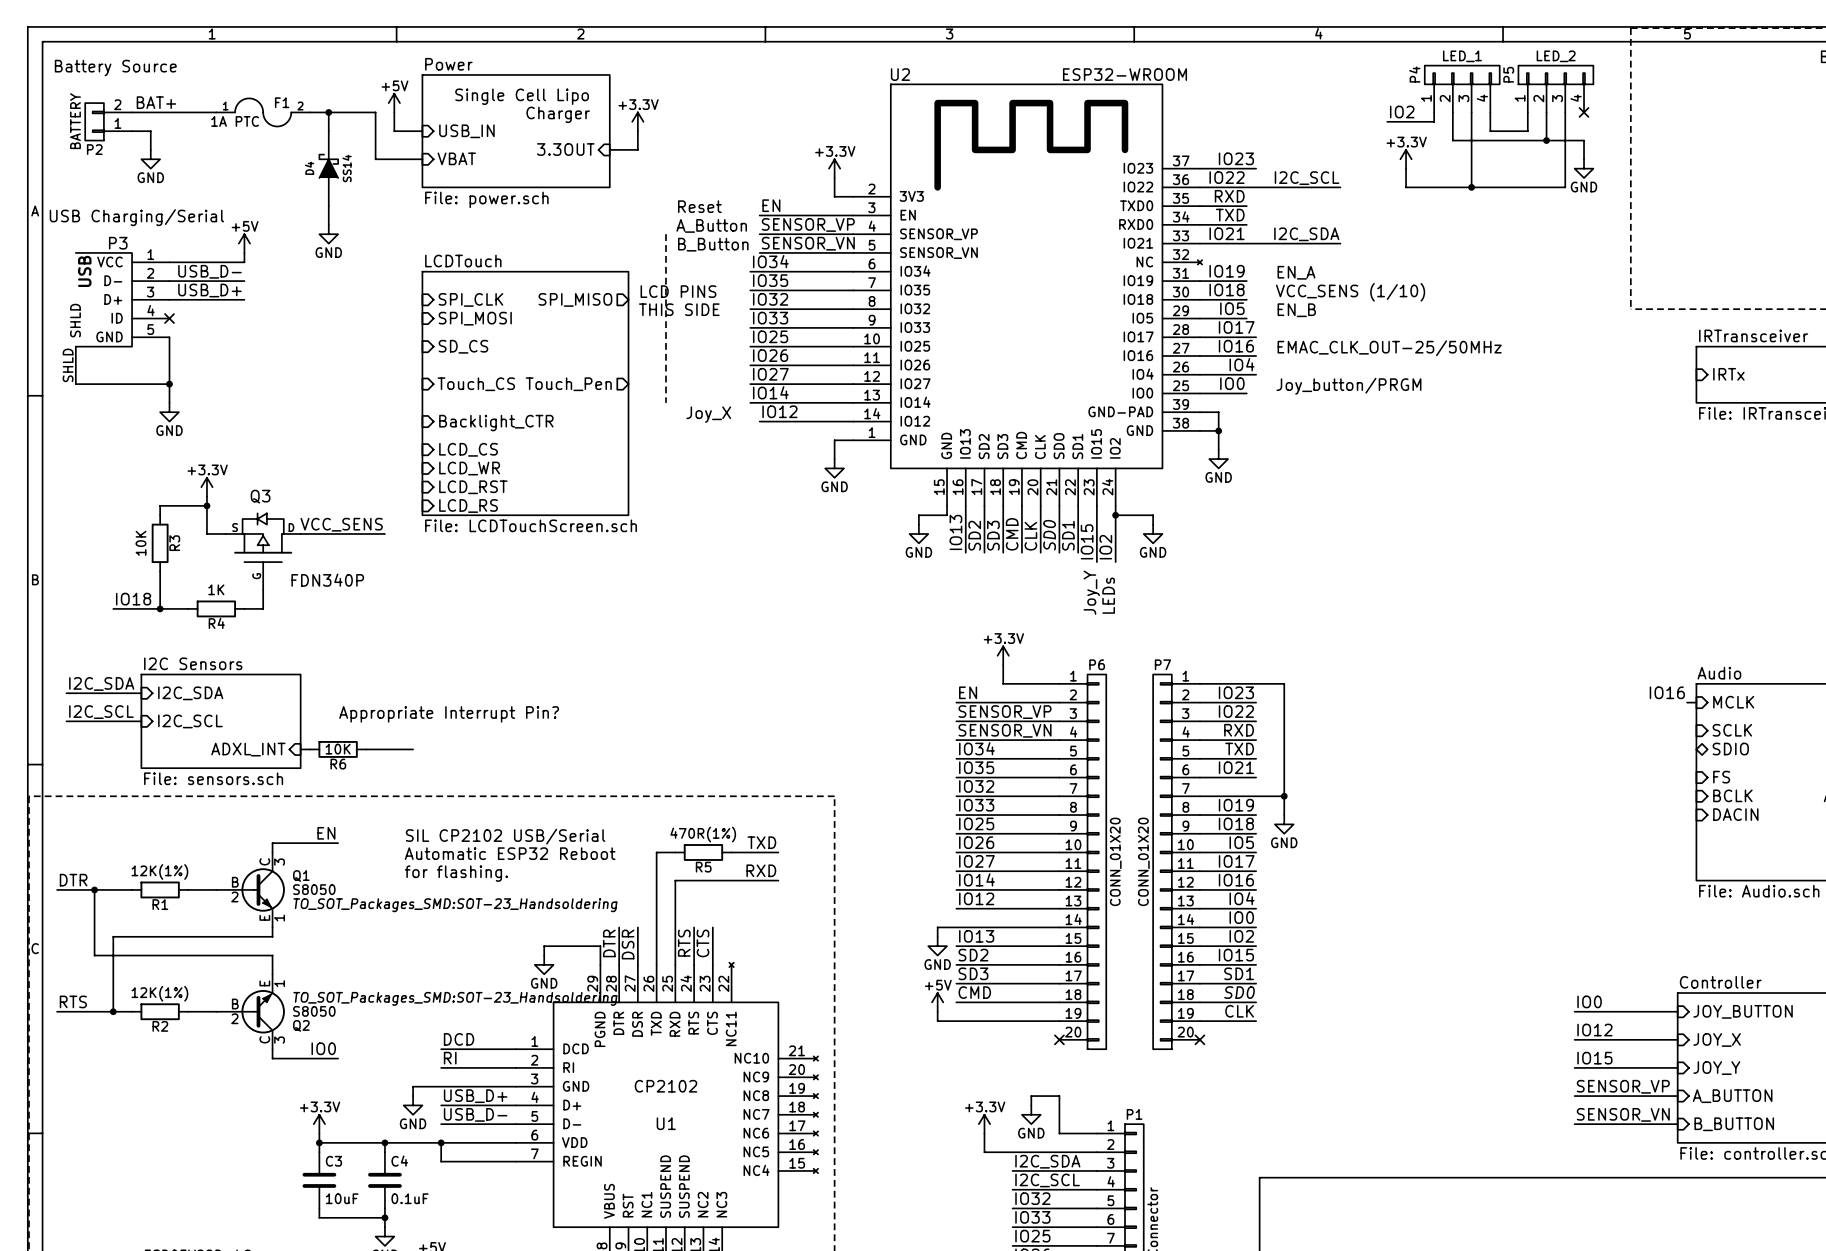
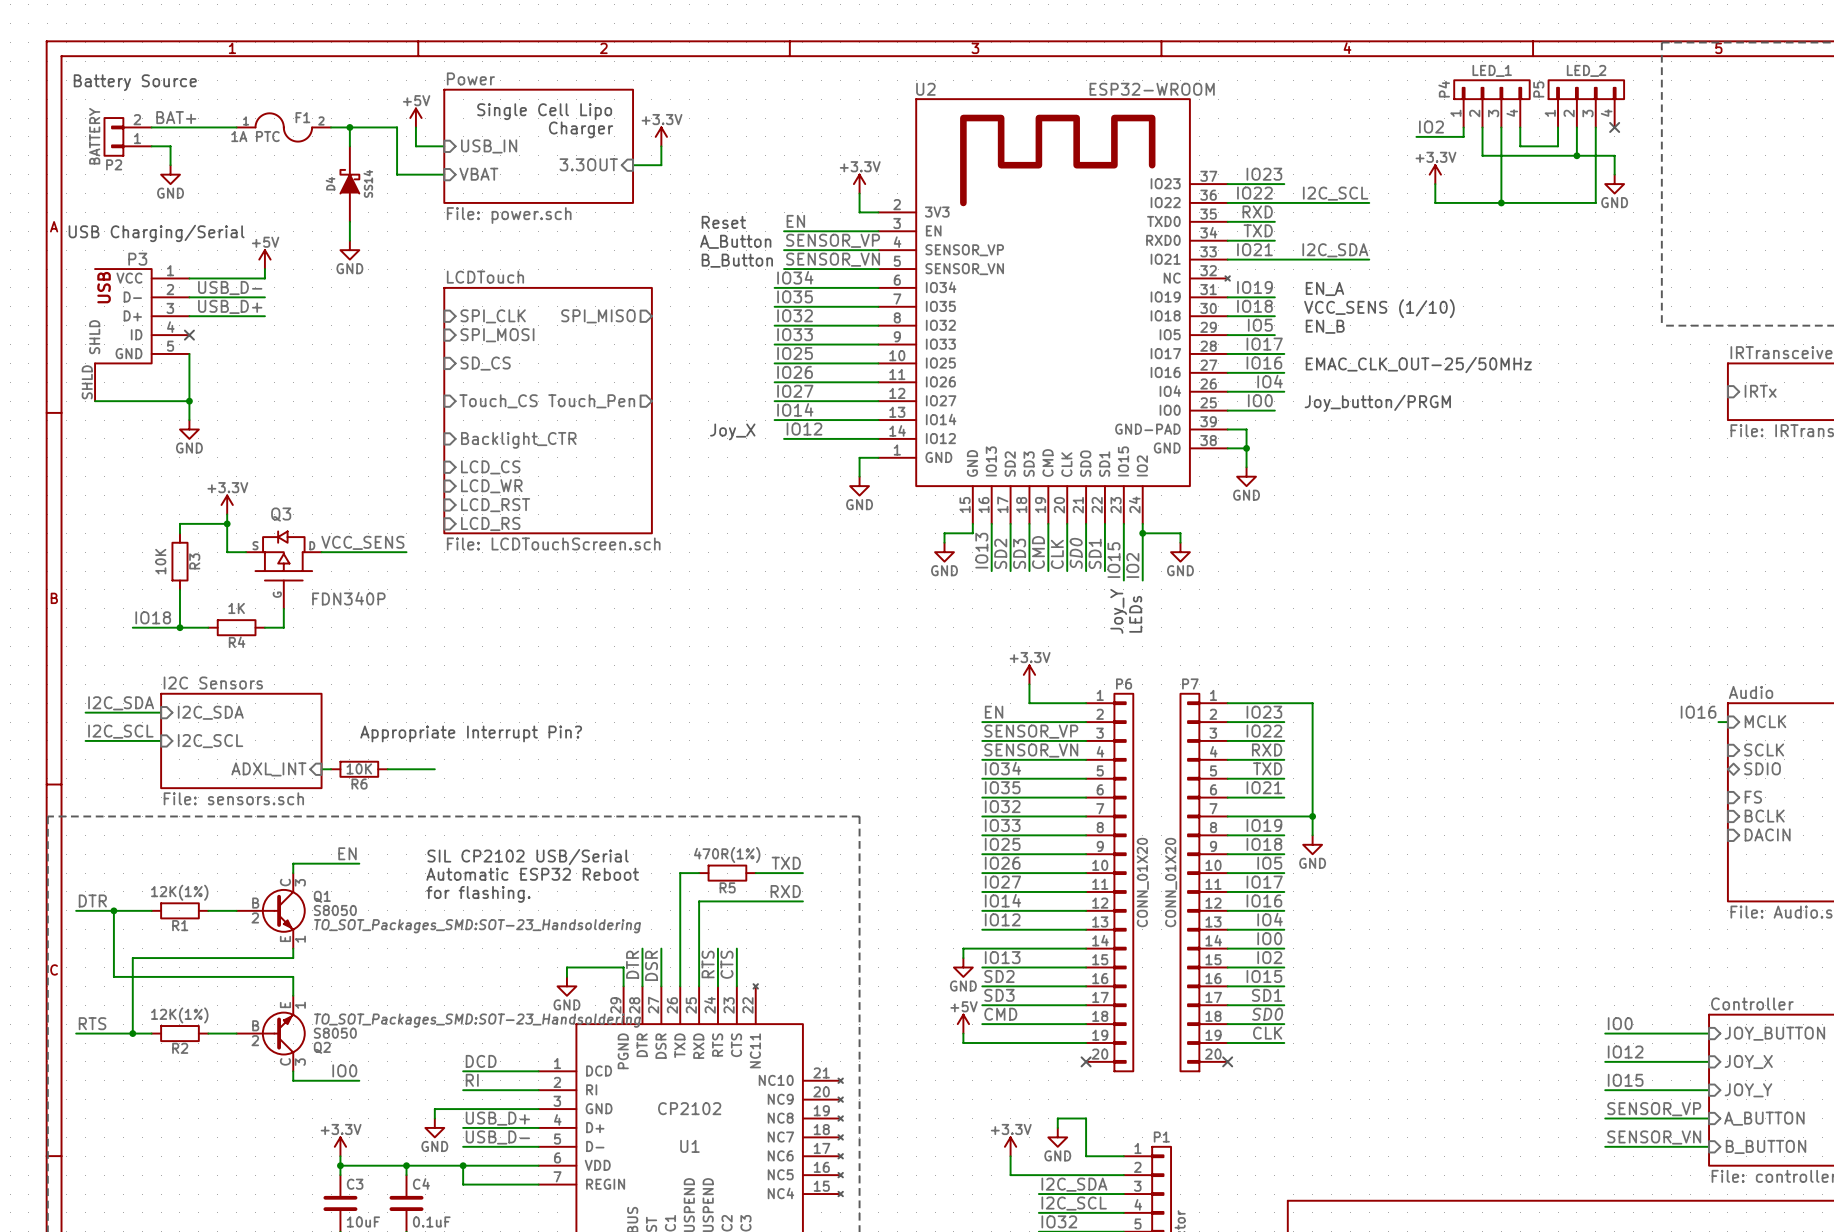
line: (665, 234) (665, 402) -> none
text: LCD PINS (678, 291) -> none
text: THIS SIDE (679, 309) -> none

